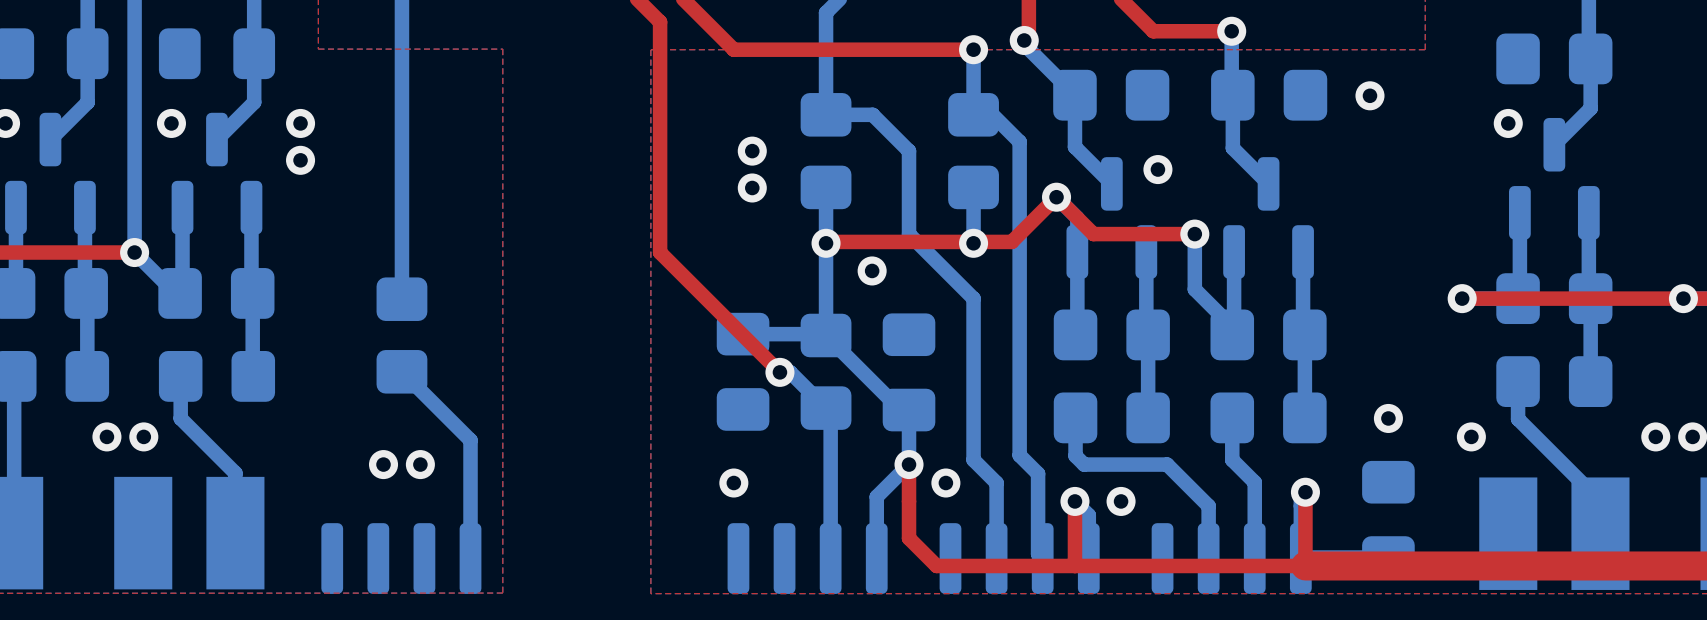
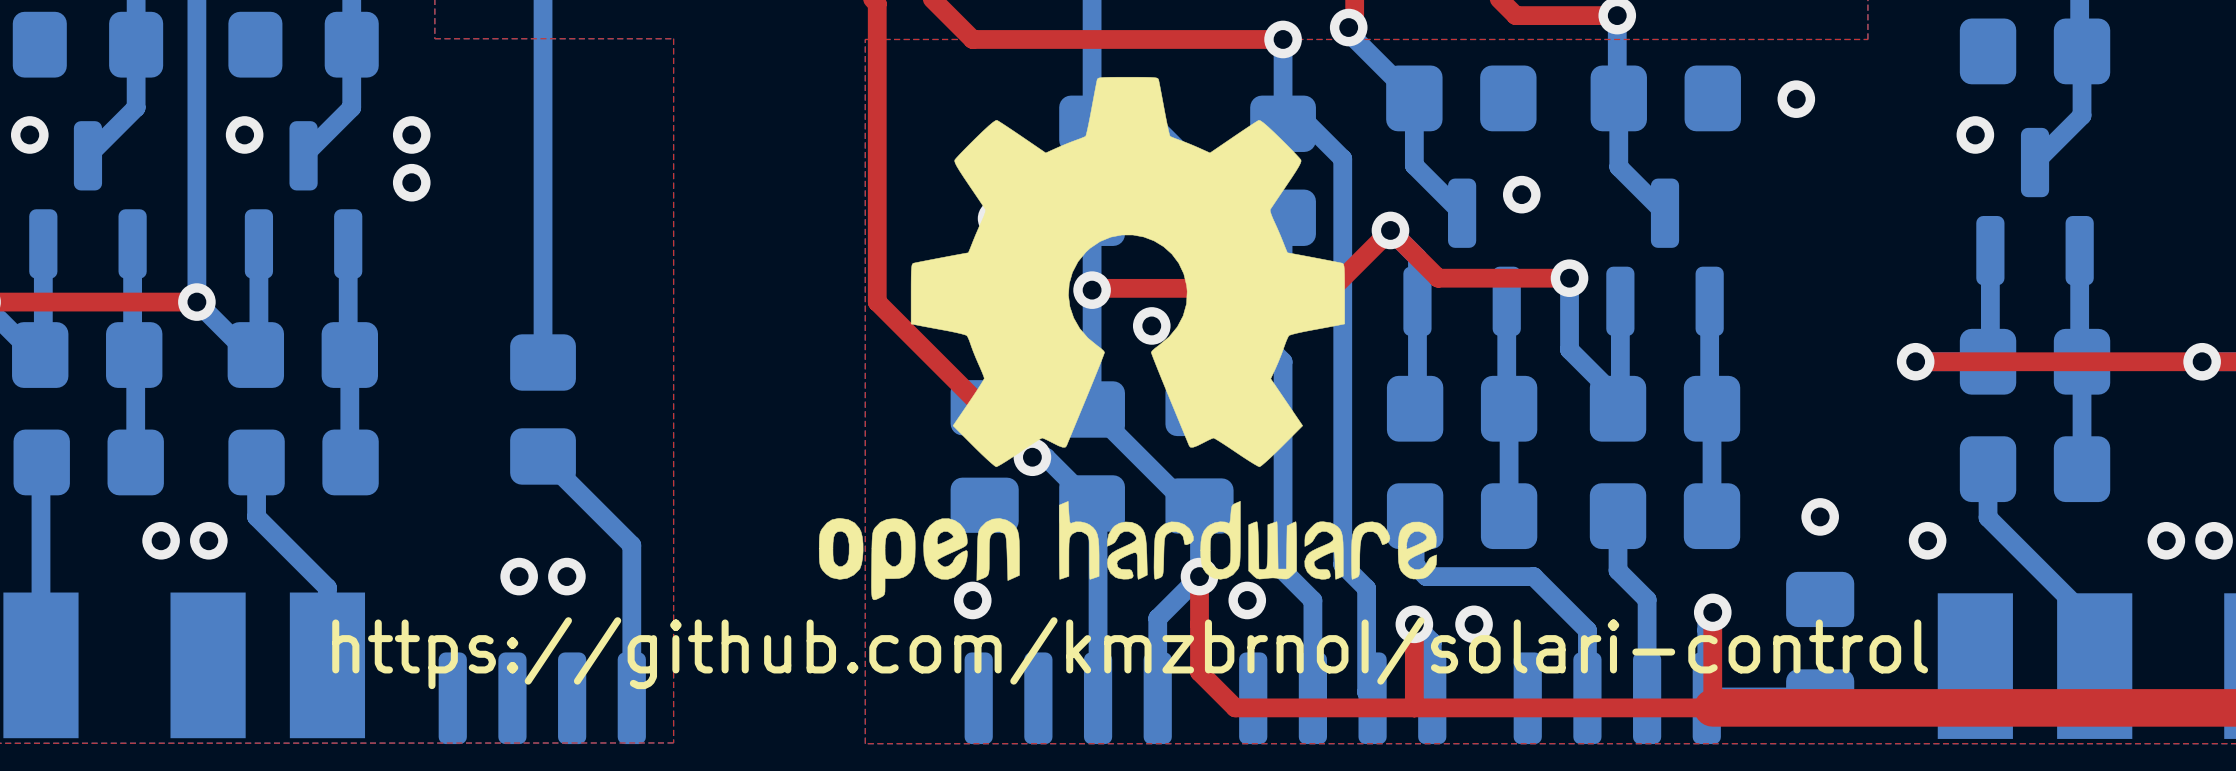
drawing: none -> [818, 76, 1437, 601]
text: none -> https://github.com/kmzbrnoI/solari-control (1130, 653)

